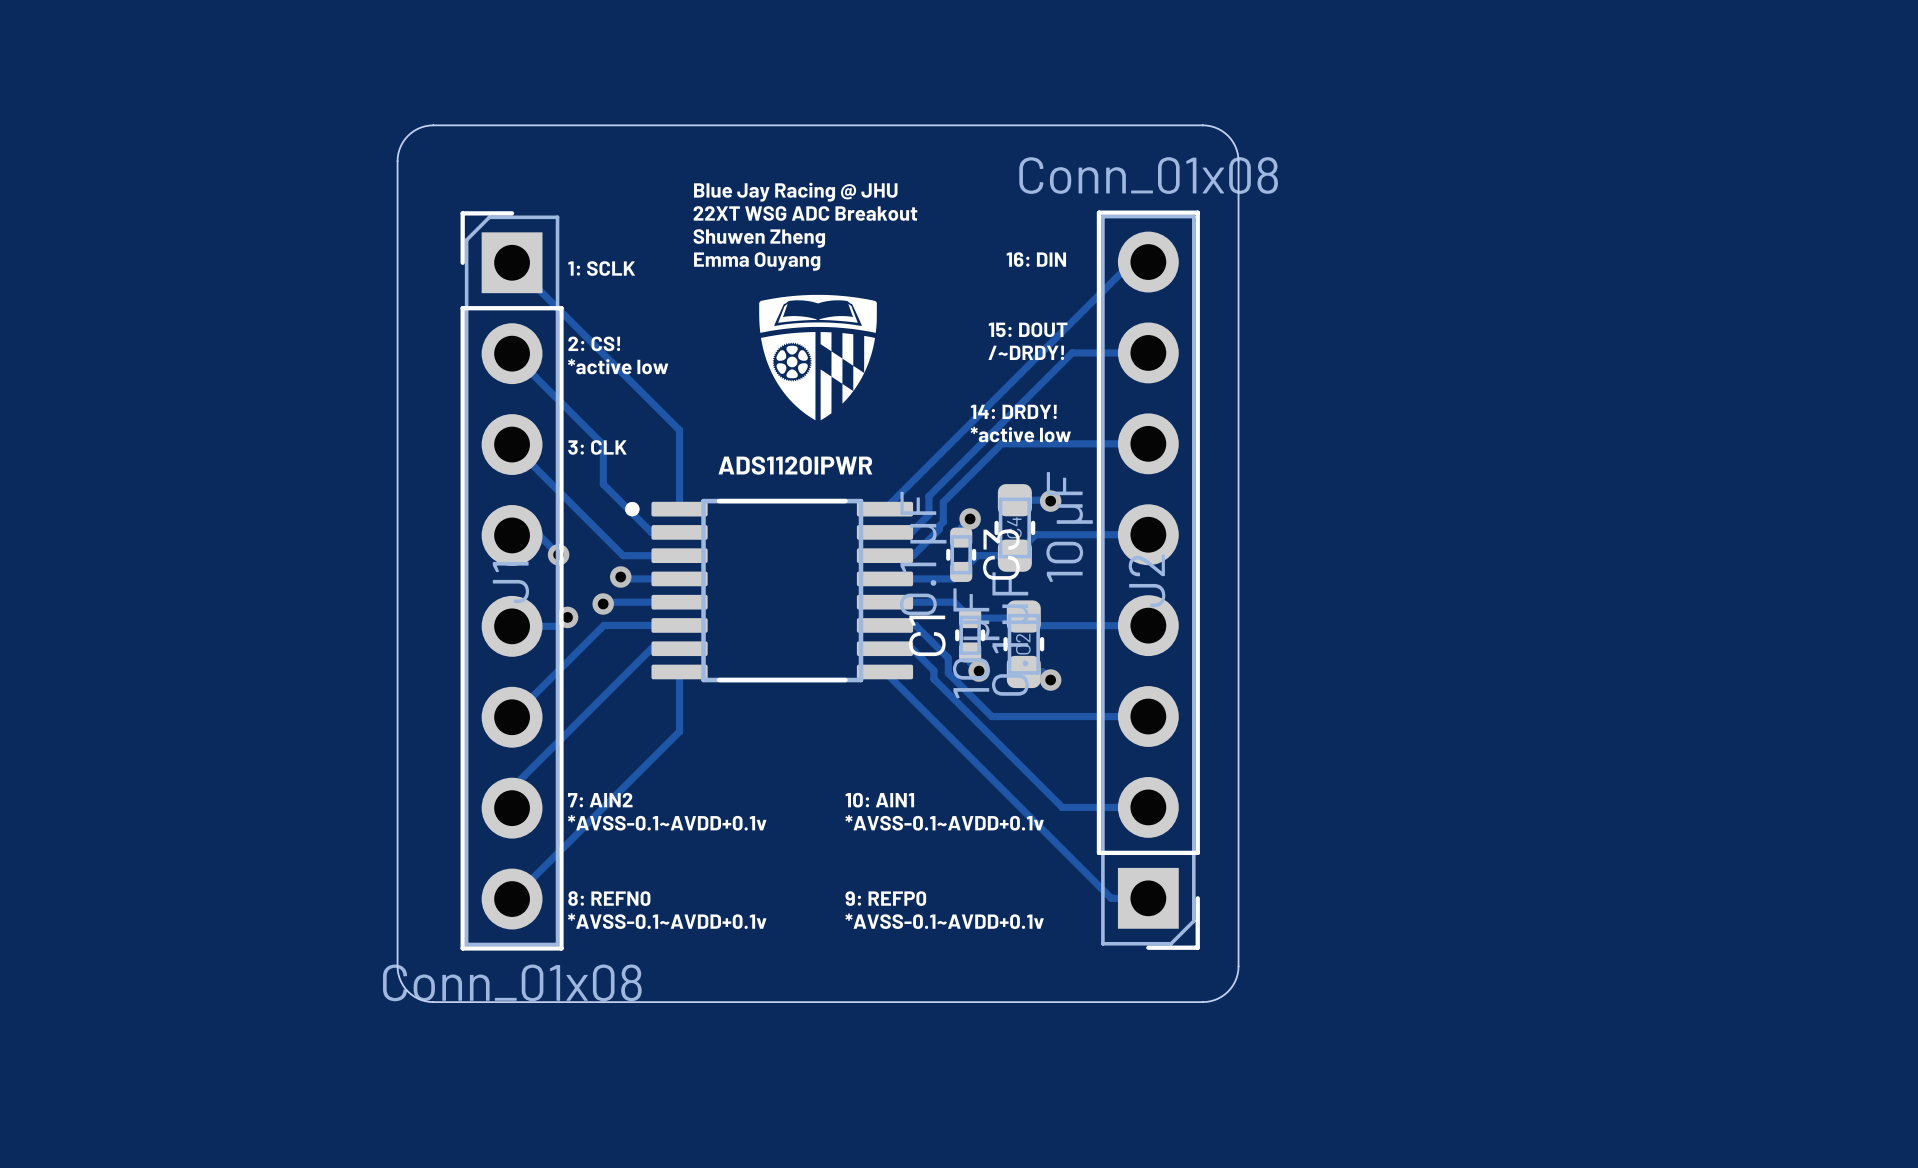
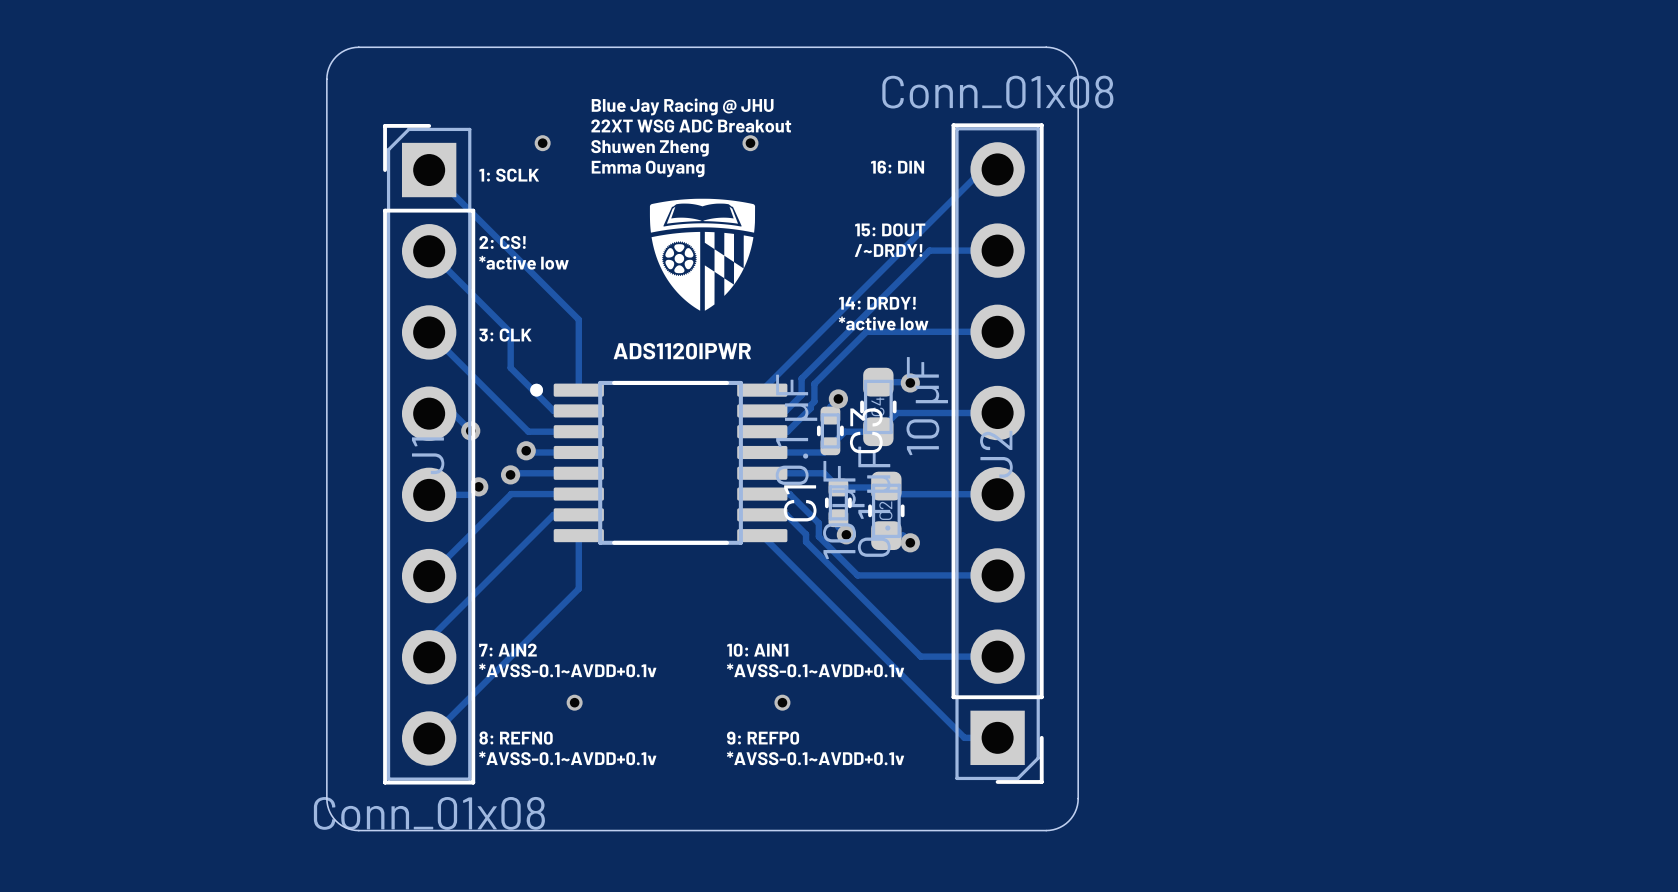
via: none -> (542, 143)
via: none -> (750, 143)
via: none -> (574, 702)
via: none -> (782, 702)

